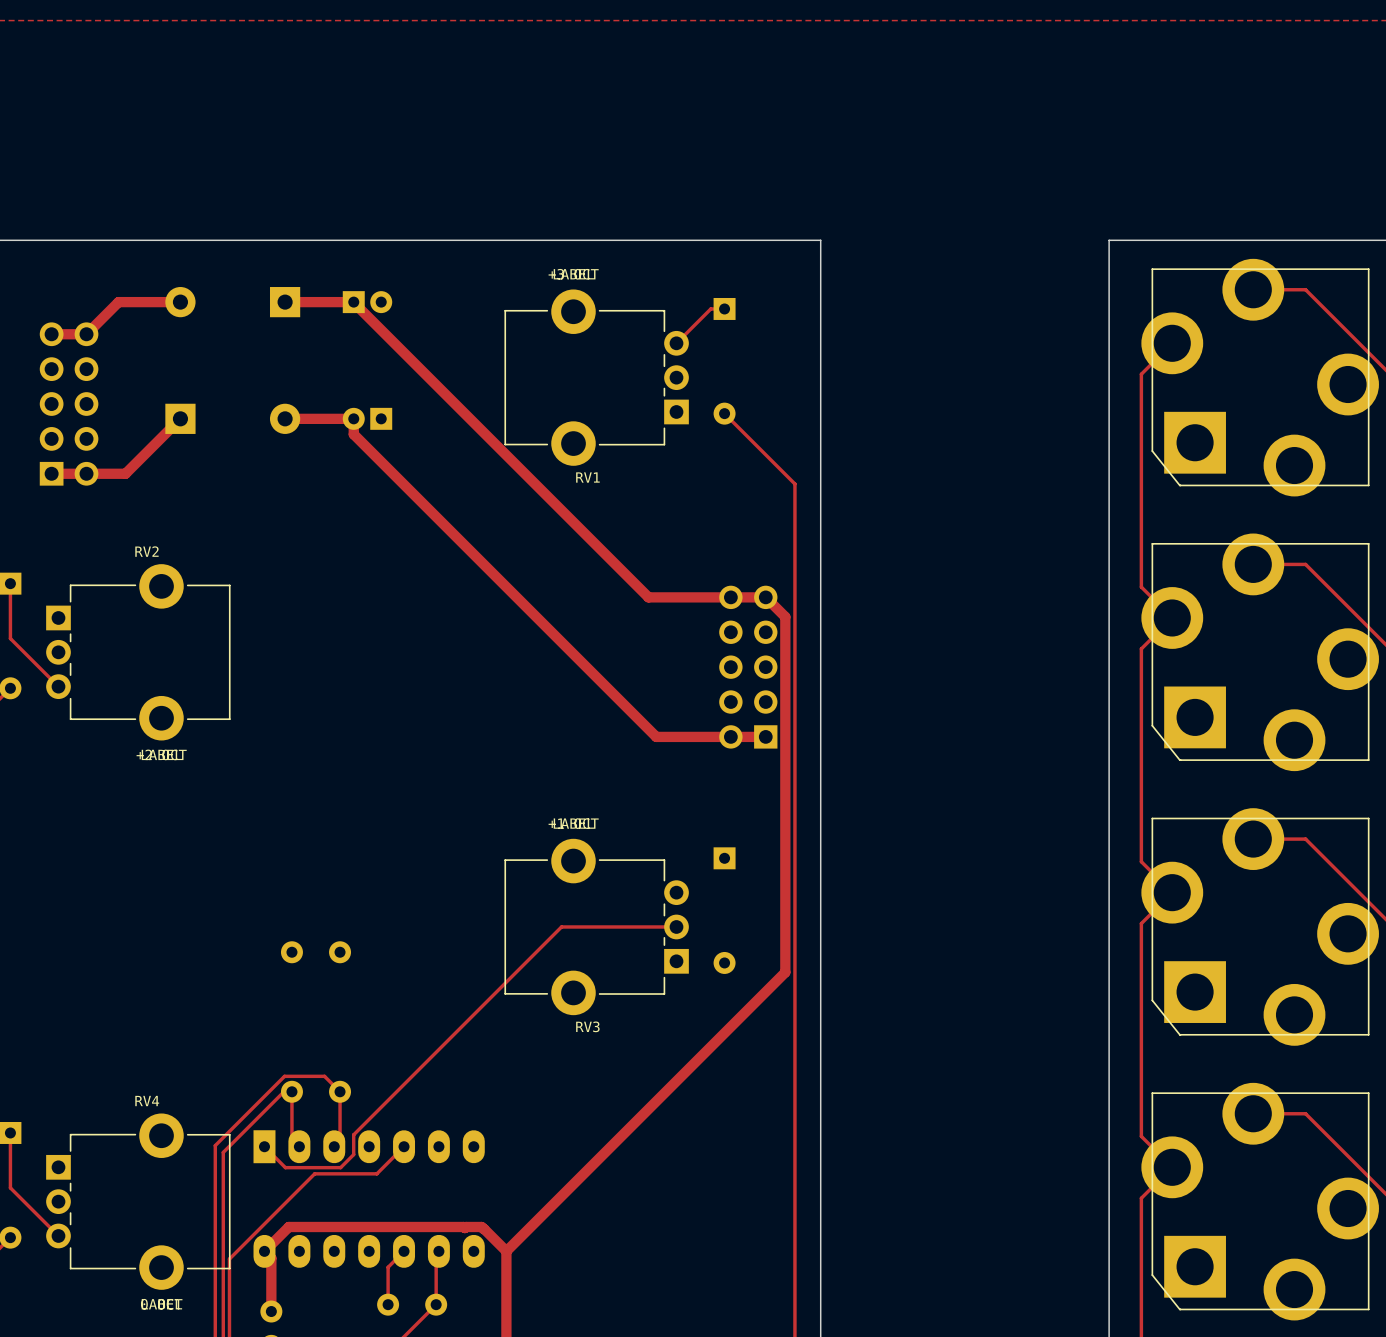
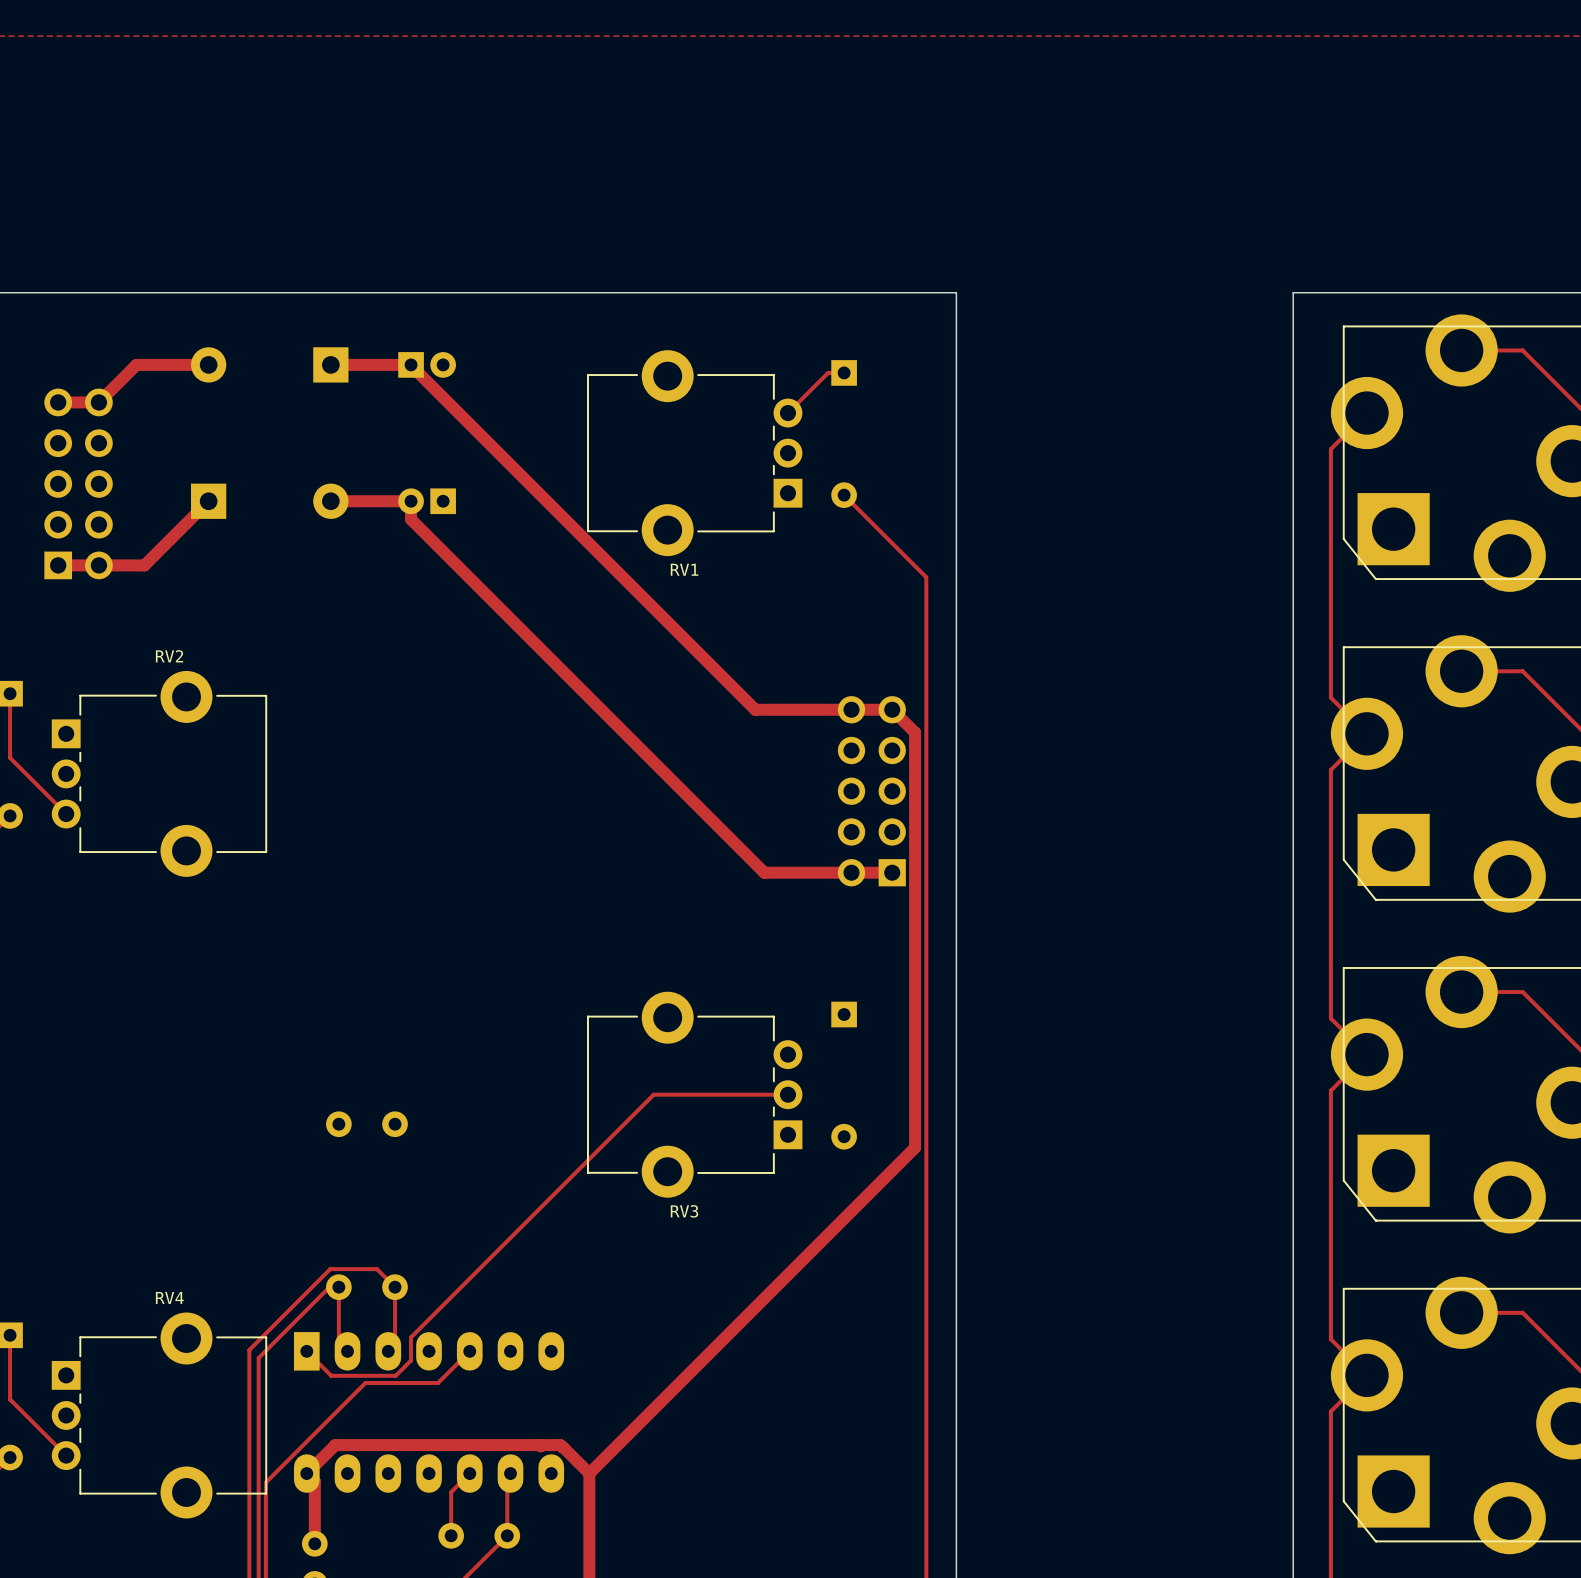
RV1 footprint: [504, 289, 689, 466] -> [587, 350, 803, 557]
RV2 footprint: [46, 564, 231, 741] -> [51, 670, 268, 877]
RV3 footprint: [504, 838, 689, 1016] -> [587, 991, 803, 1198]
RV4 footprint: [46, 1113, 231, 1290] -> [51, 1312, 268, 1519]

